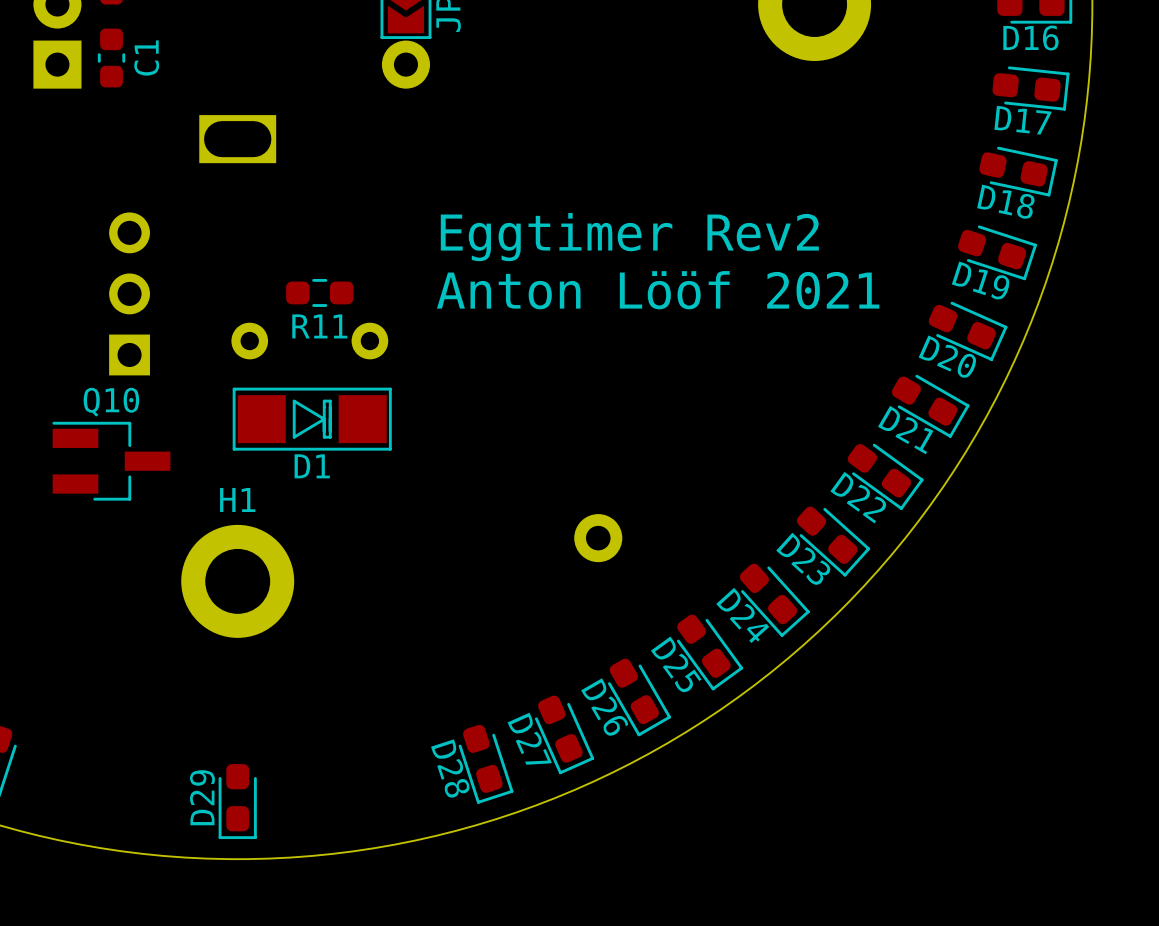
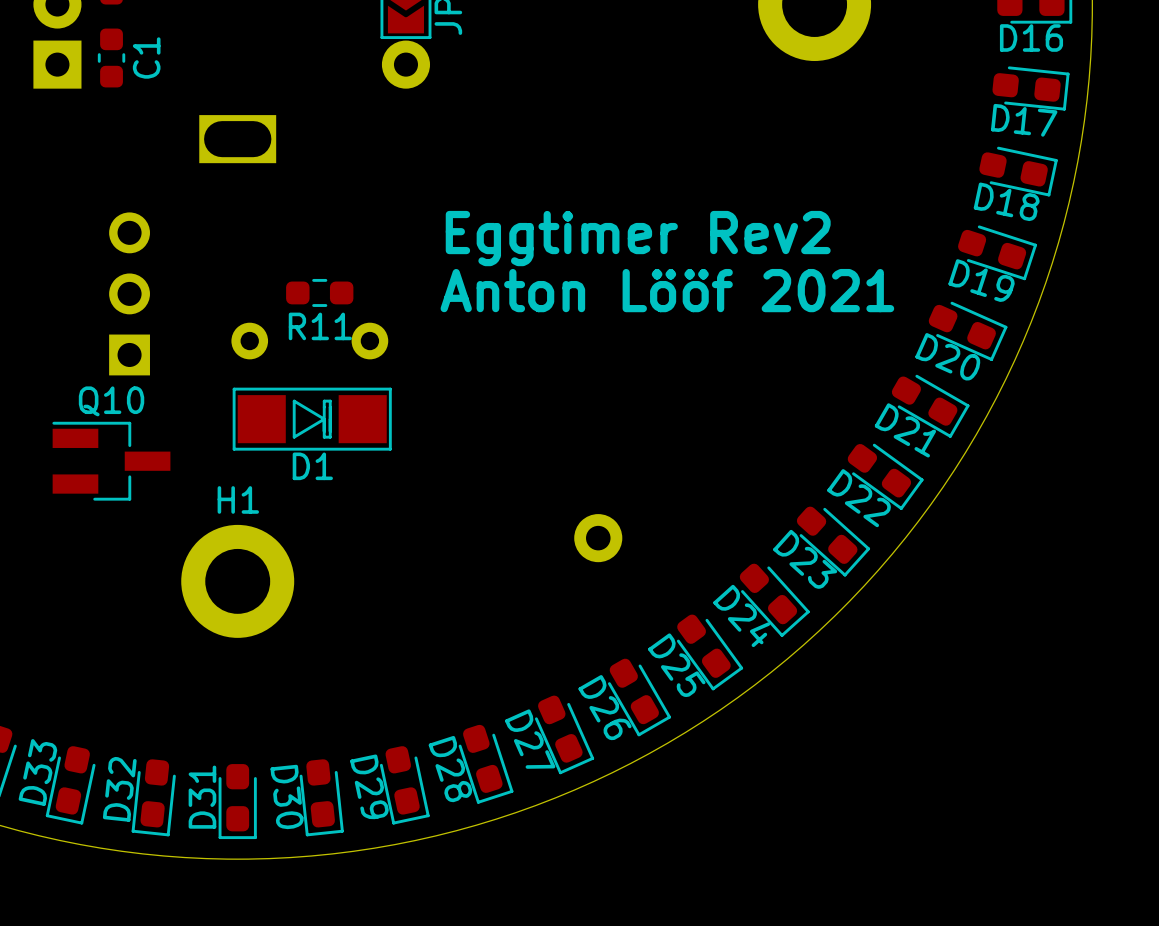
D33: none -> (70, 785)
D29: none -> (404, 785)
D32: none -> (153, 797)
D29 name: D29 (202, 797) -> D31 (202, 797)
D30: none -> (321, 797)

